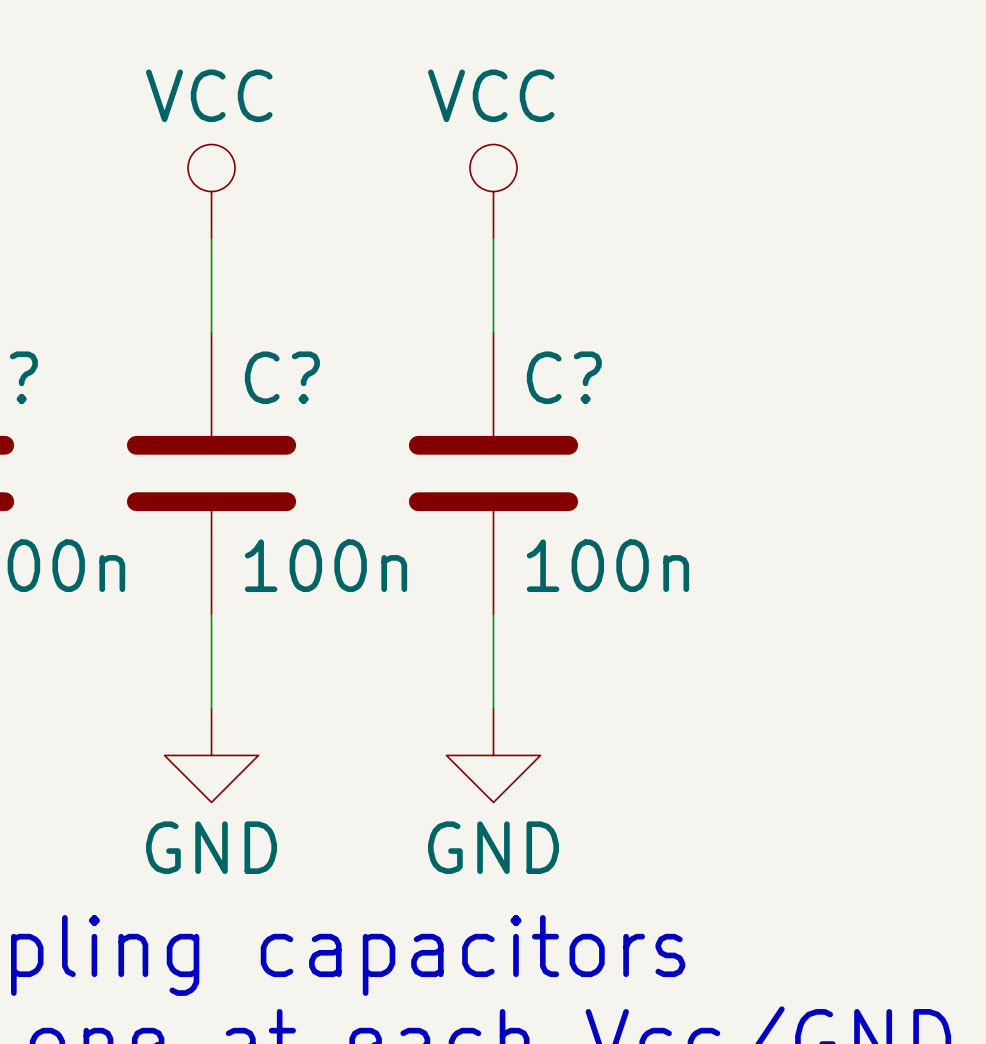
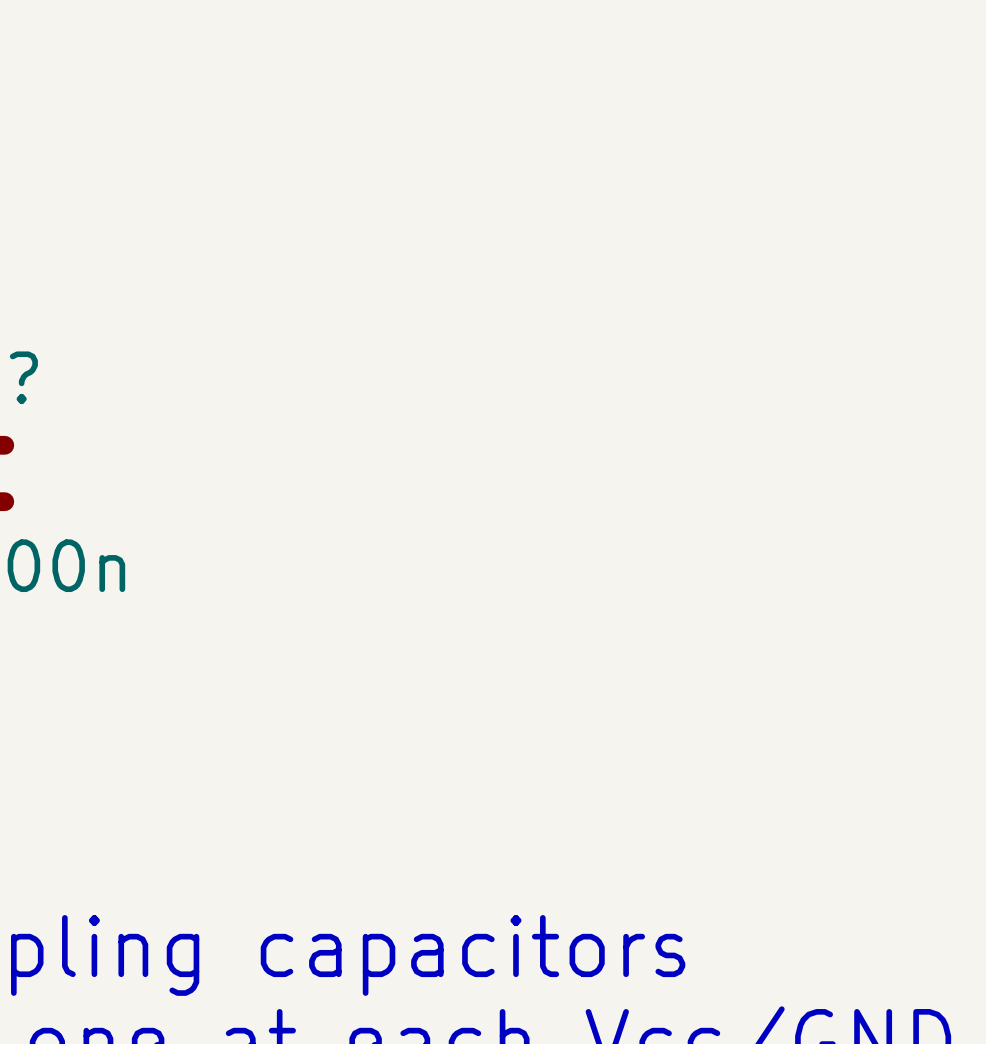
power symbol: VCC (211, 191) -> none
power symbol: VCC (493, 191) -> none
wire: (211, 238) (211, 332) -> none
wire: (493, 238) (493, 332) -> none
C?: 100n (211, 473) -> none
C?: 100n (493, 473) -> none
wire: (211, 614) (211, 708) -> none
wire: (493, 614) (493, 708) -> none
power symbol: GND (211, 755) -> none
power symbol: GND (493, 755) -> none

